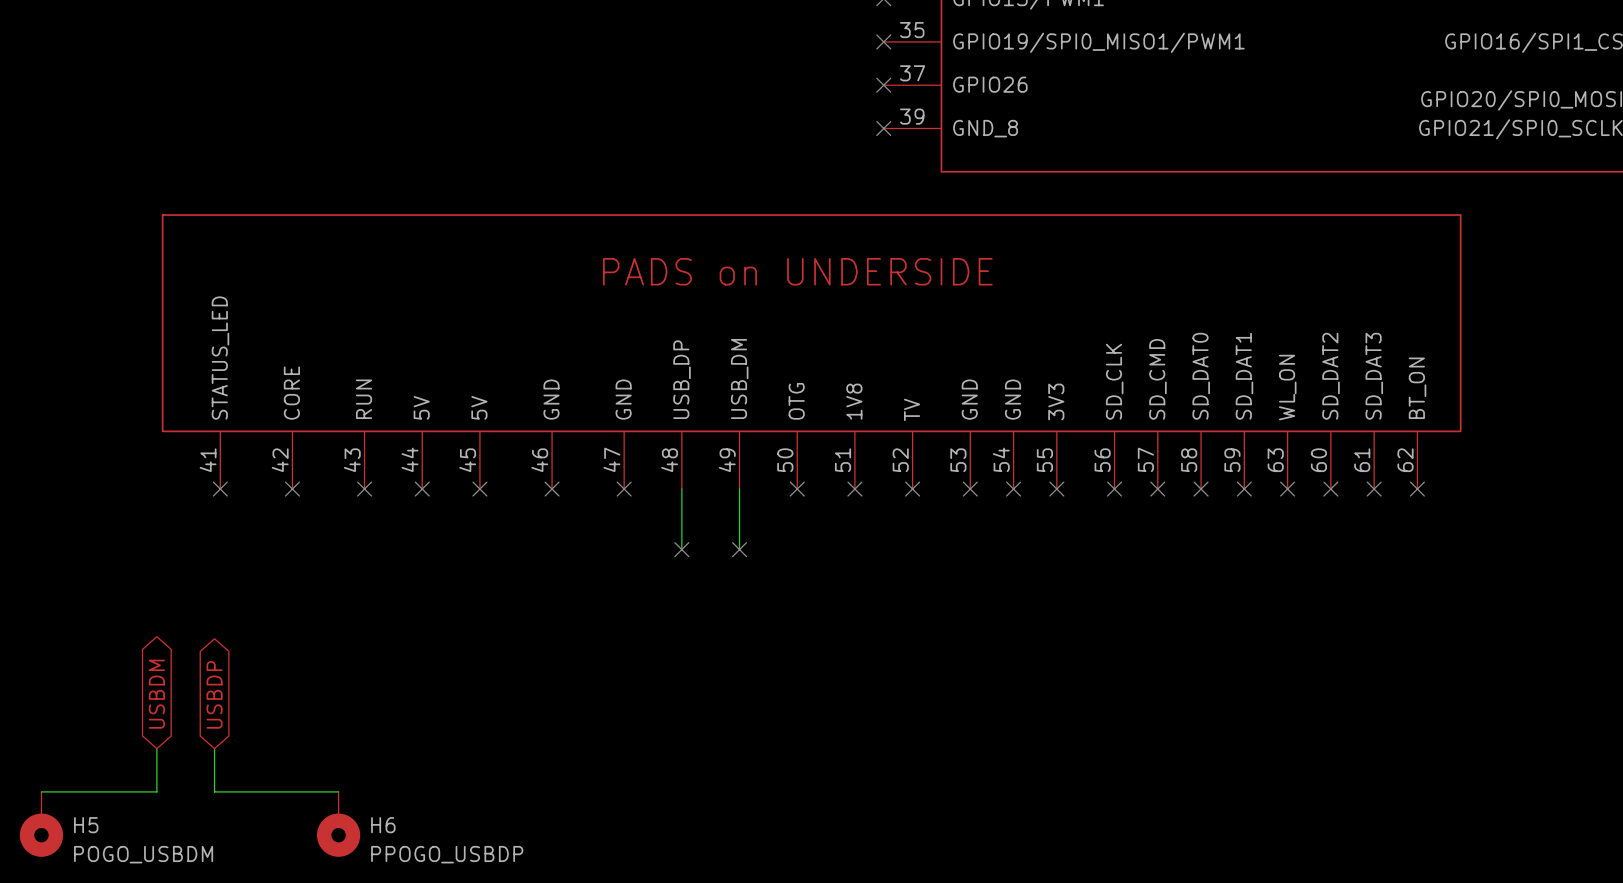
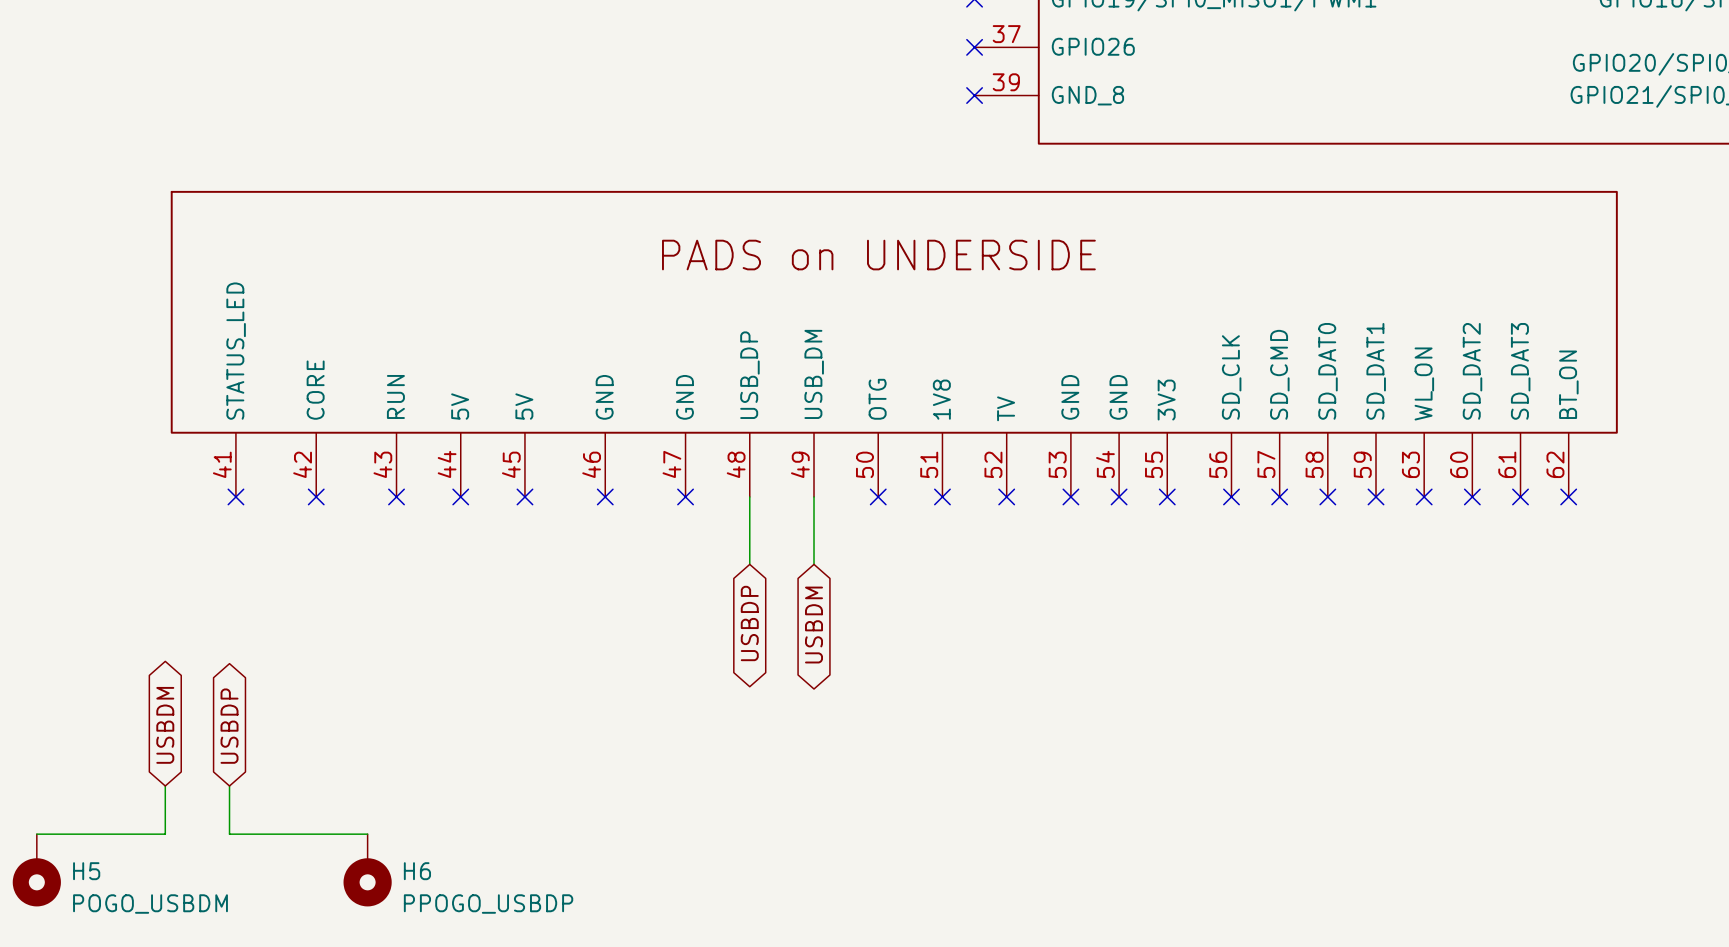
no-connect mark: (681, 549) -> none
no-connect mark: (739, 549) -> none
global label: none -> USBDP (749, 623)
global label: none -> USBDM (814, 625)

